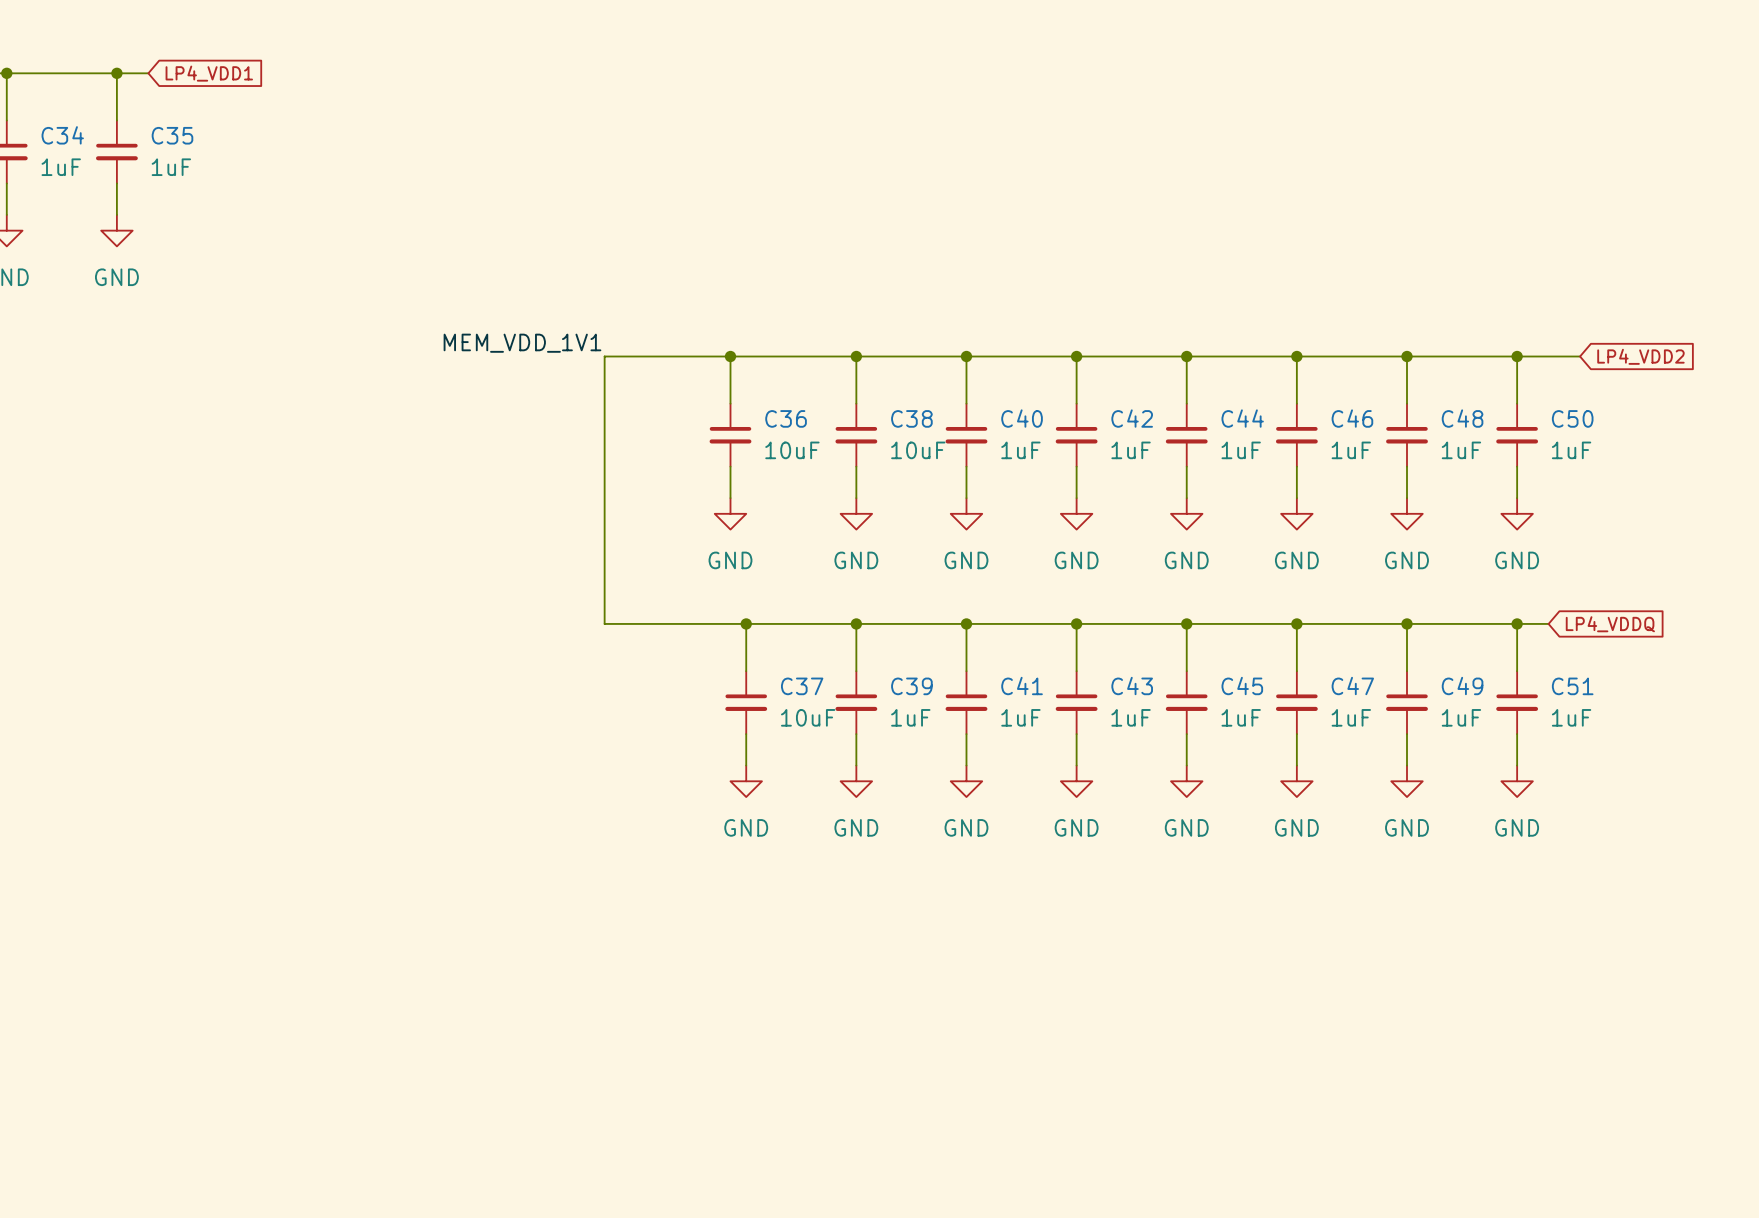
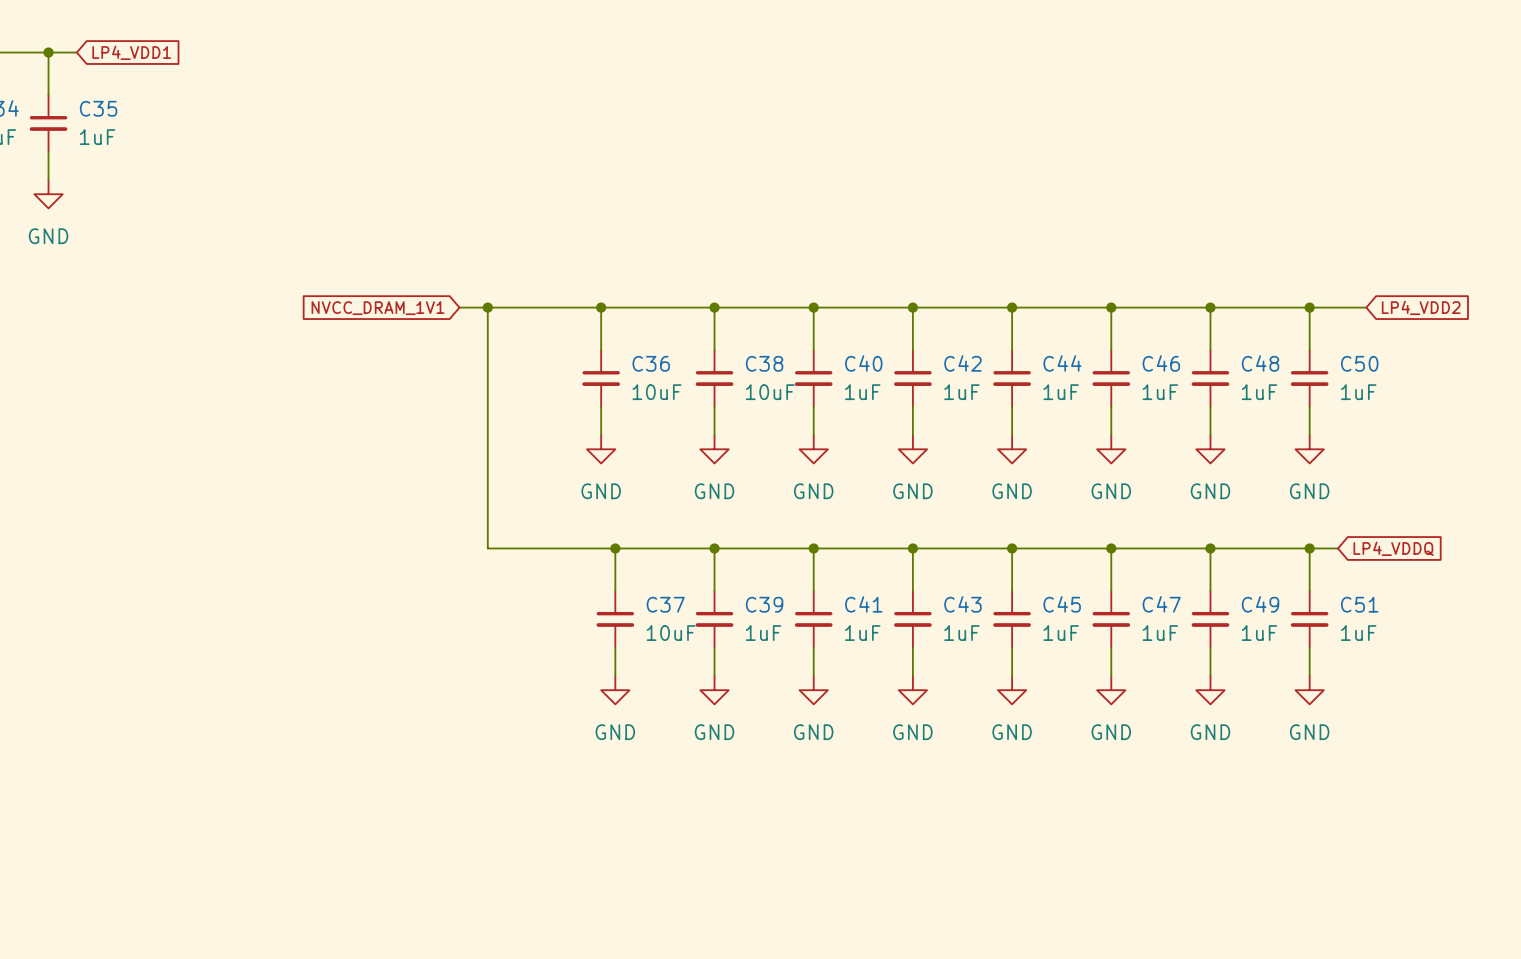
label: MEM_VDD_1V1 (522, 343) -> none
wire: none -> (459, 307) (487, 307)
junction: none -> (487, 307)
global label: none -> NVCC_DRAM_1V1 (378, 308)

